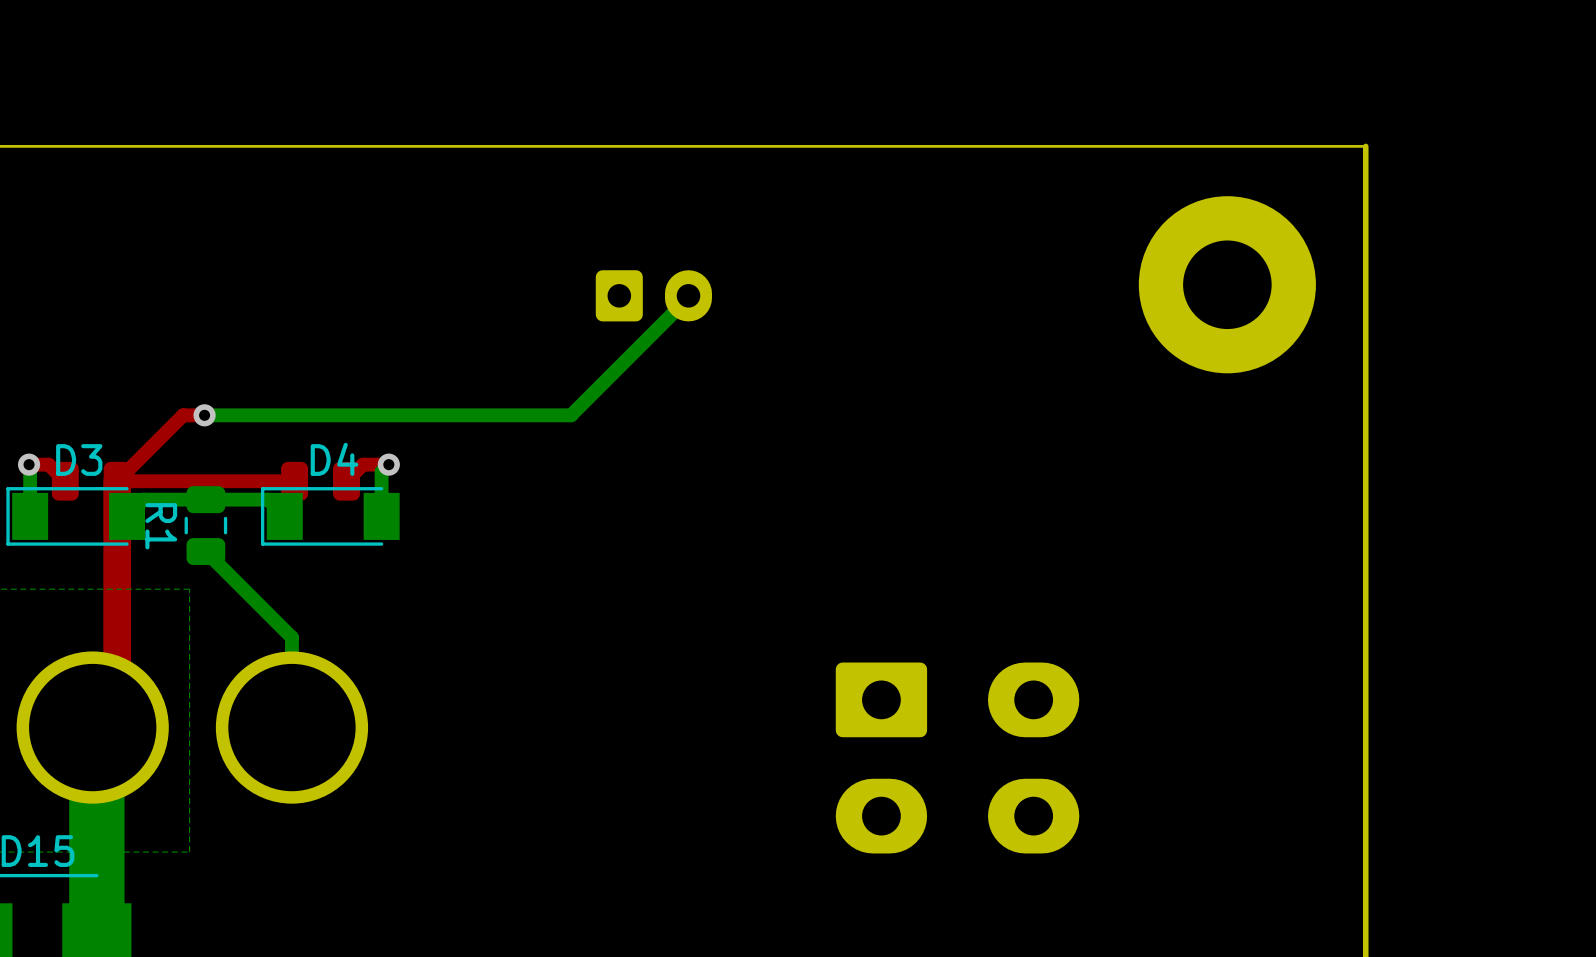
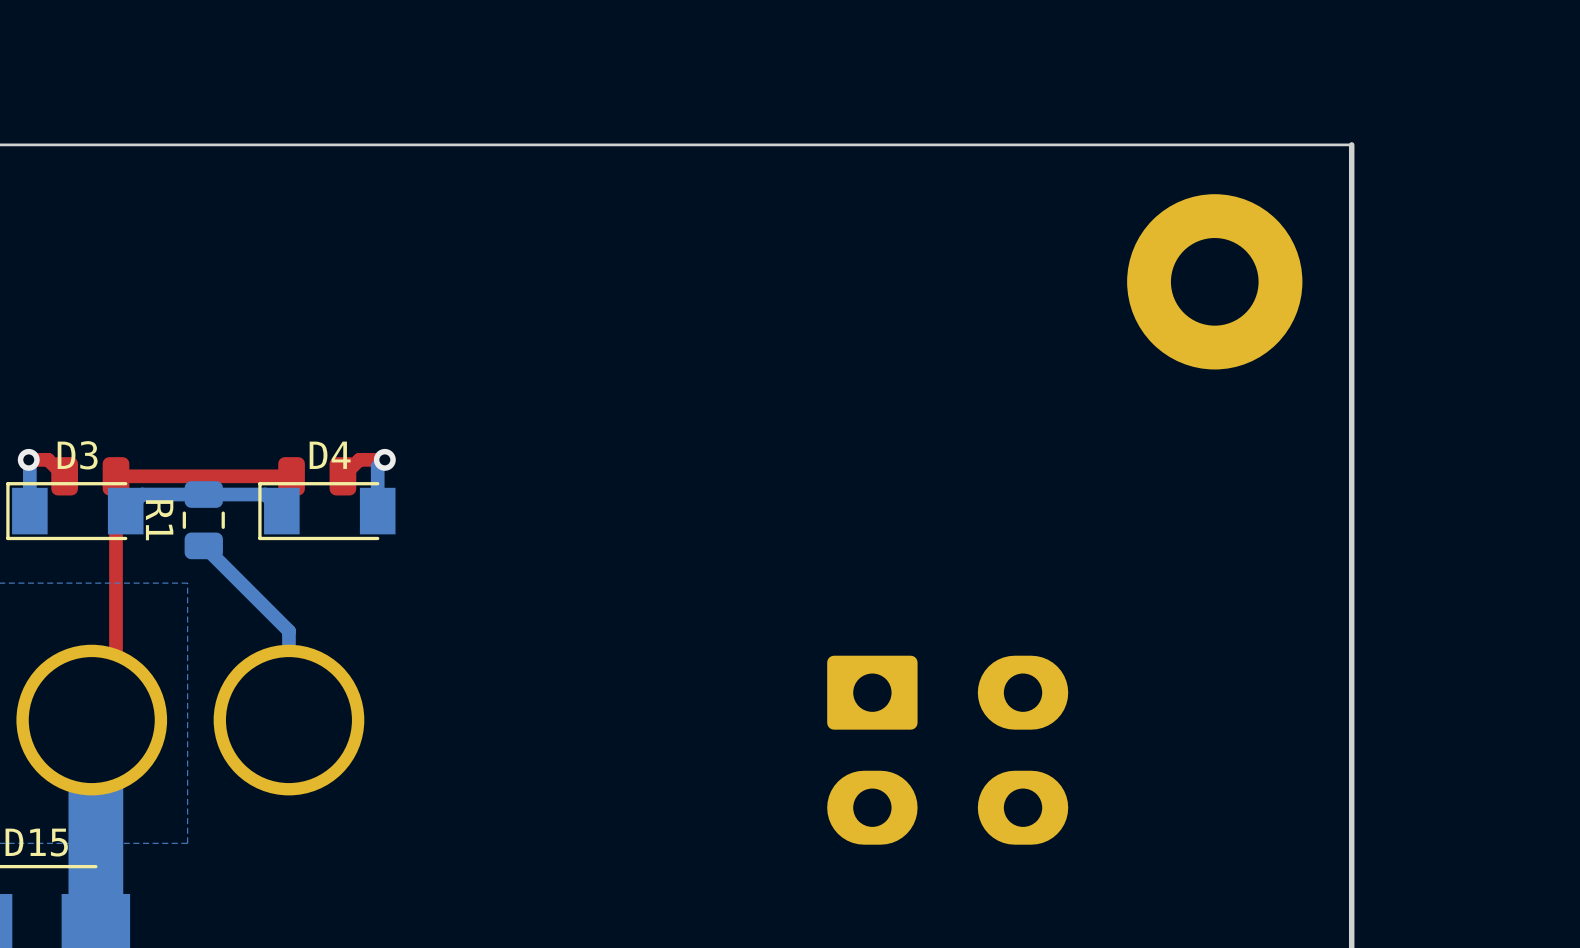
part: (653, 295) -> none
bottom track: (688, 295) (571, 415) (204, 415) -> none
top track: (204, 415) (183, 415) (117, 481) -> none
via: (204, 415) -> none
top track width: thick (117, 481) (117, 703) (92, 727) -> thin (115, 476) (115, 695) (91, 720)

